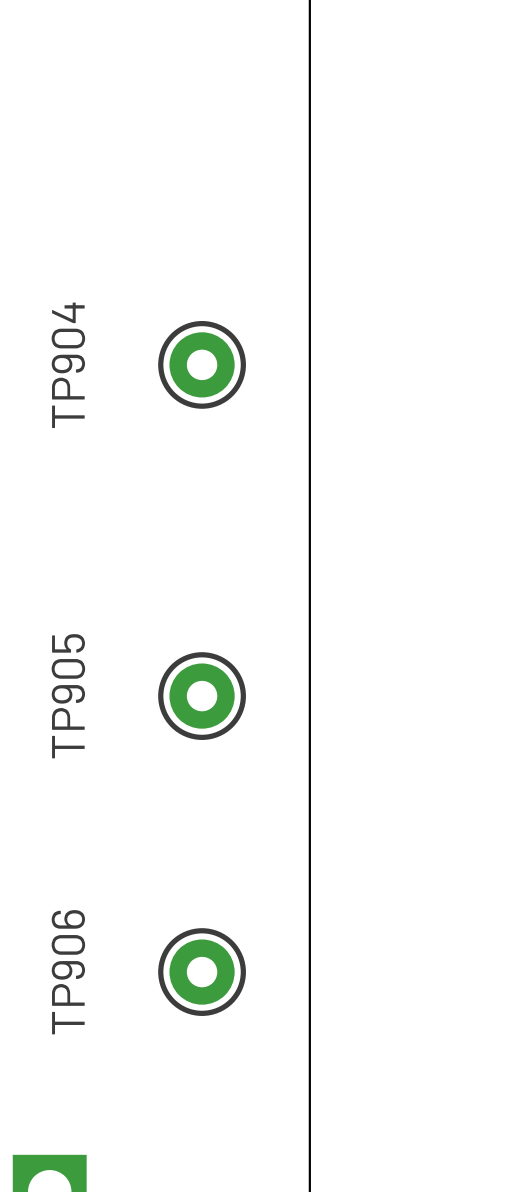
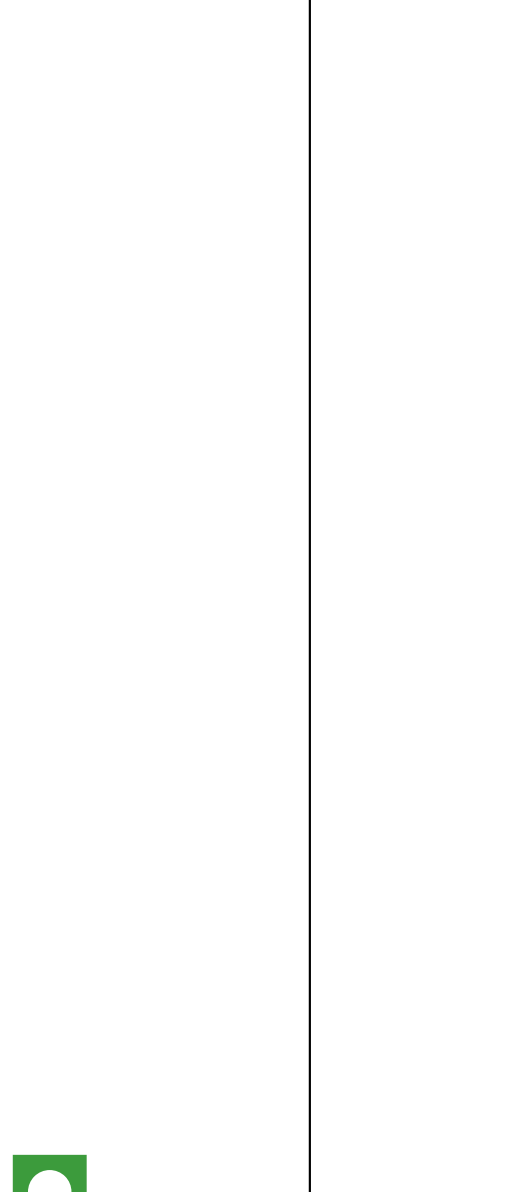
TP904: (202, 364) -> none
TP905: (202, 696) -> none
TP906: (202, 972) -> none

